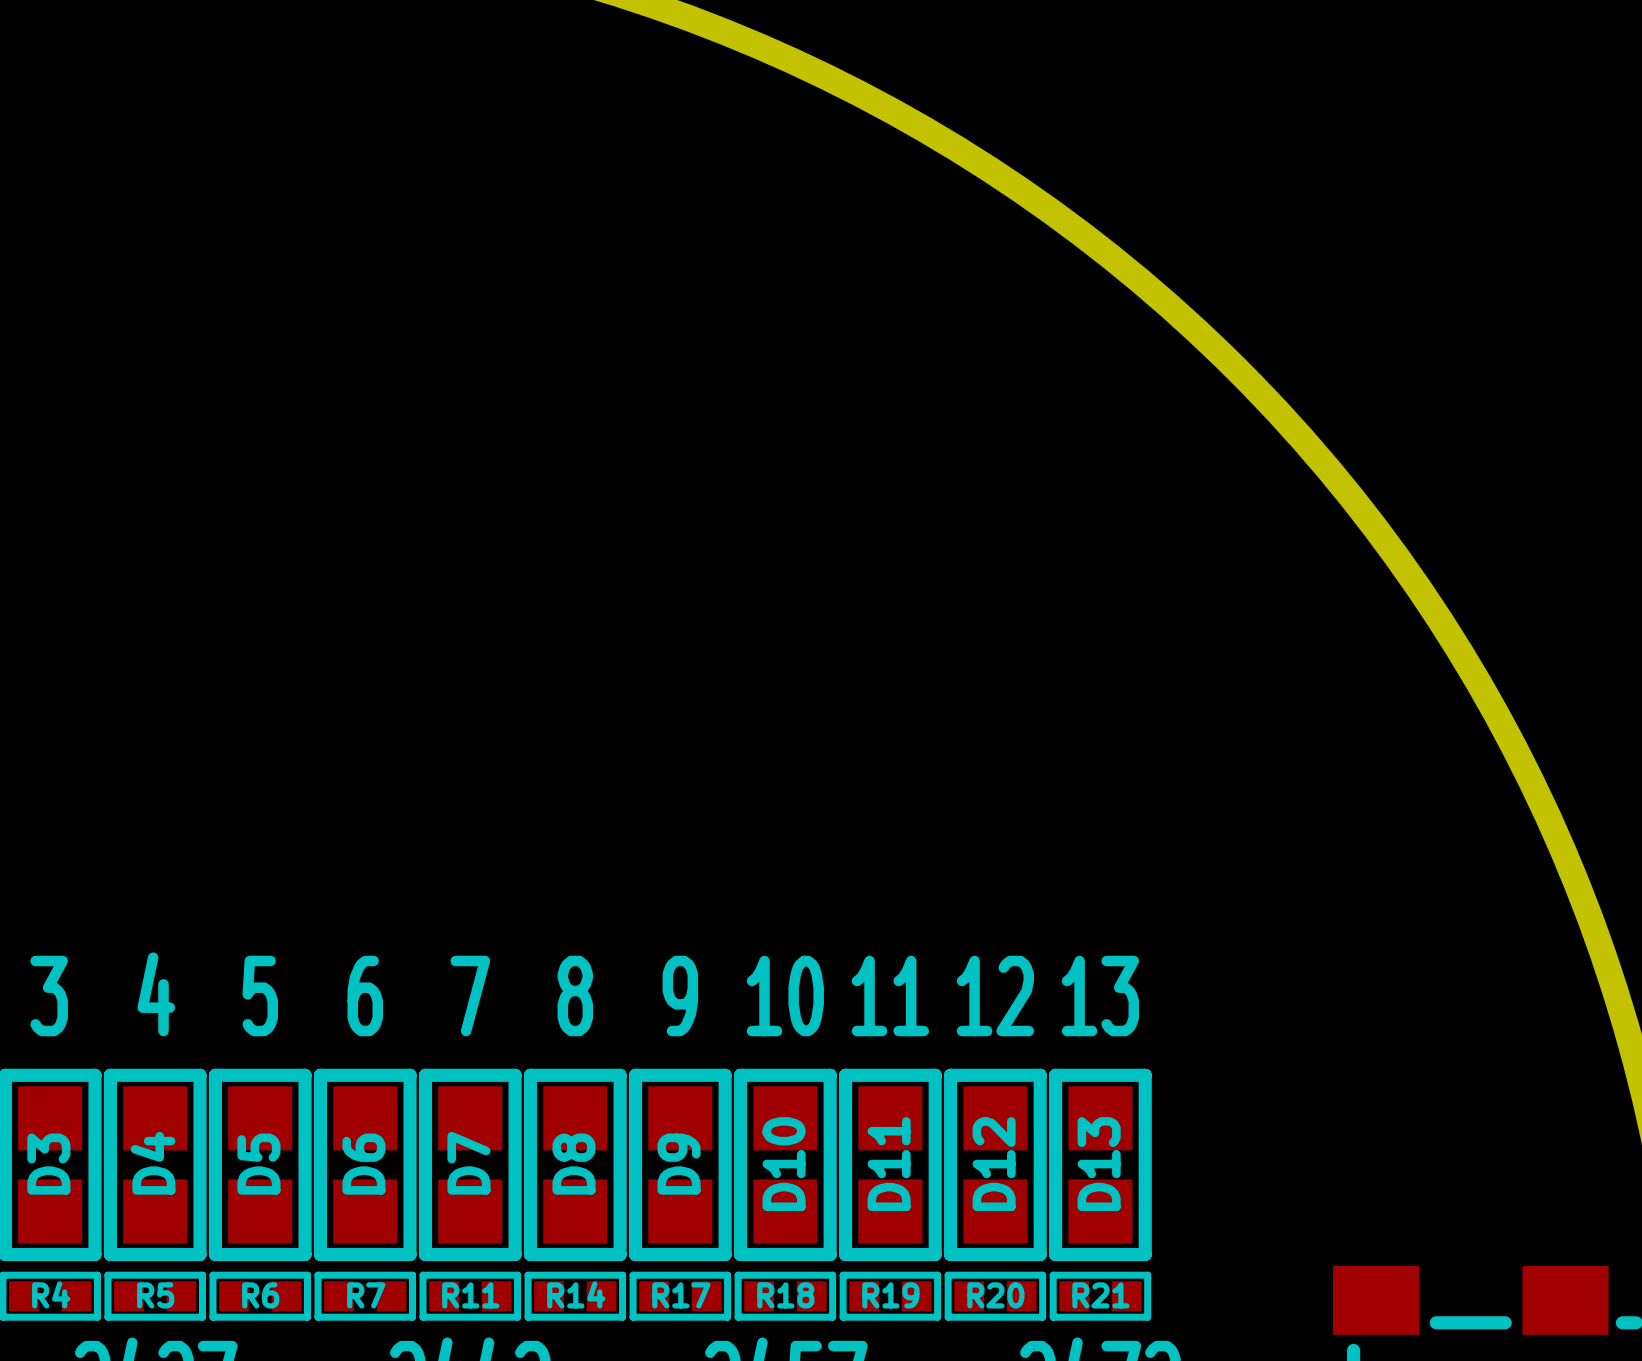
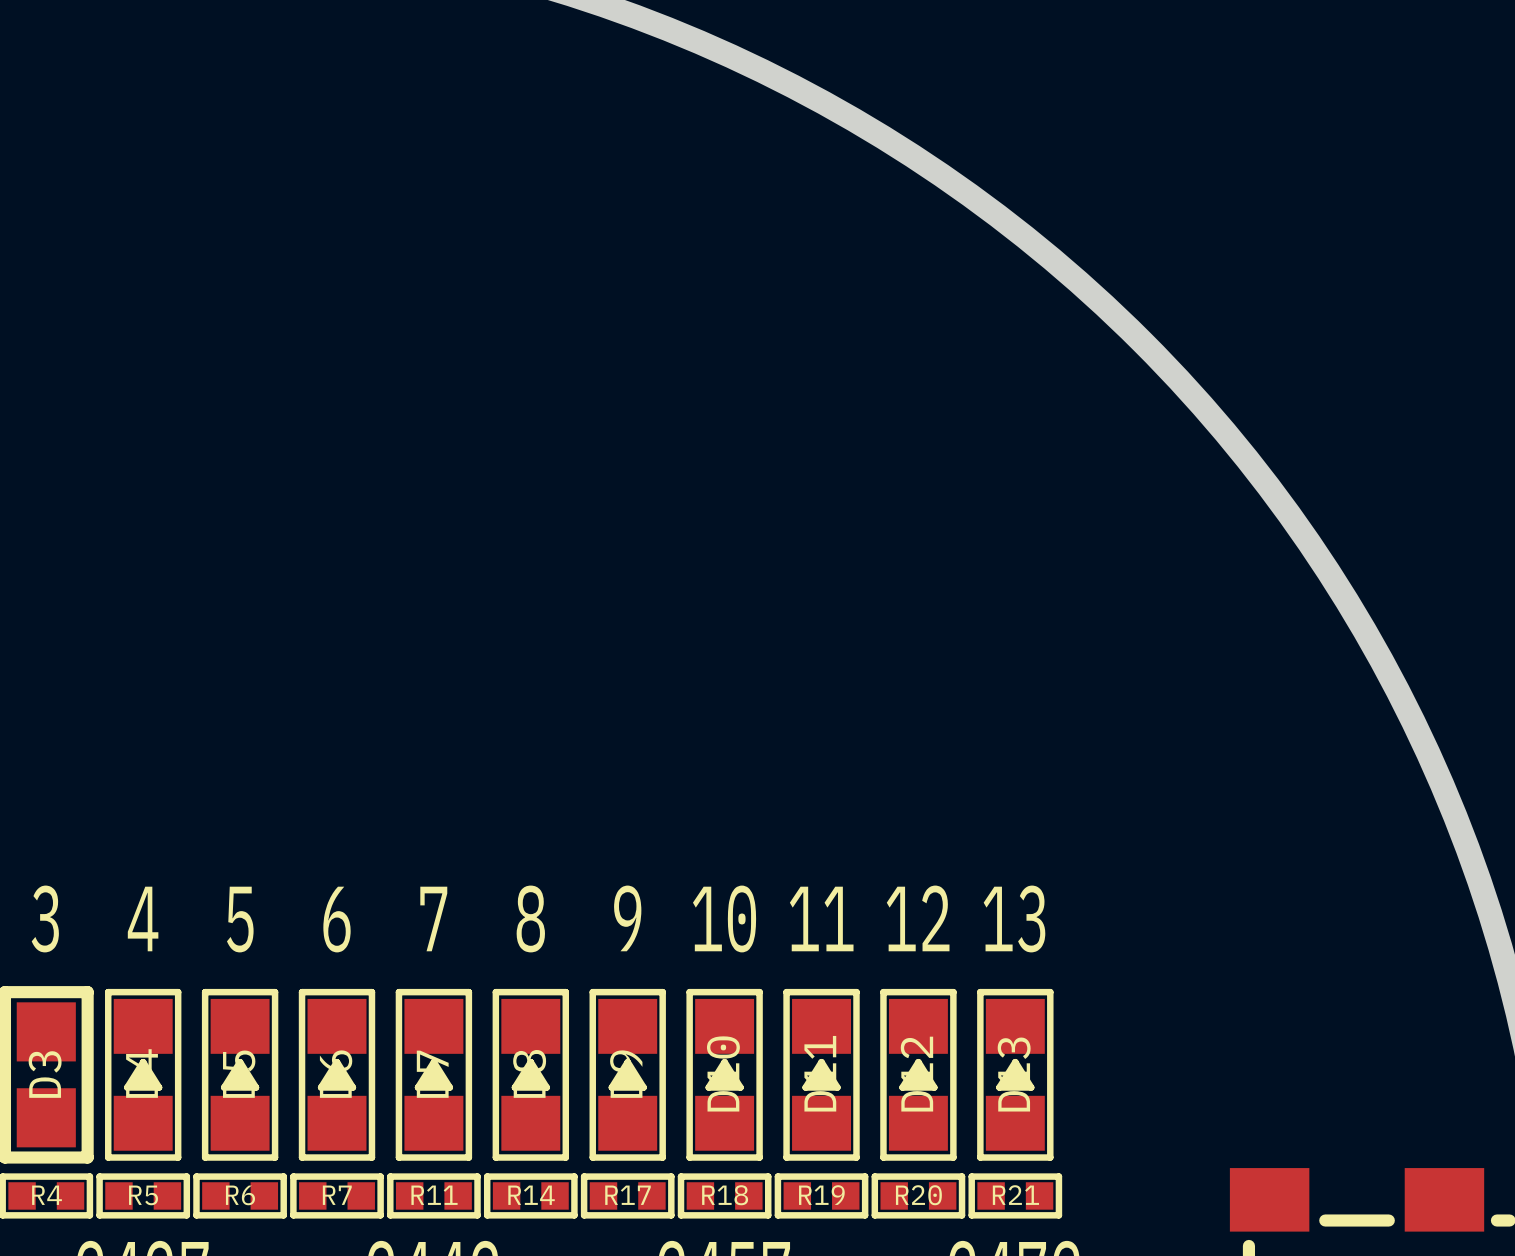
D4 footprint: [103, 1068, 207, 1262] -> [105, 988, 182, 1161]
D5 footprint: [208, 1068, 312, 1262] -> [201, 988, 279, 1161]
D6 footprint: [313, 1068, 417, 1262] -> [298, 988, 376, 1161]
D7 footprint: [418, 1068, 522, 1262] -> [395, 988, 473, 1161]
D8 footprint: [523, 1068, 627, 1262] -> [492, 988, 570, 1161]
D9 footprint: [628, 1068, 732, 1262] -> [589, 988, 666, 1161]
D10 footprint: [733, 1068, 837, 1262] -> [686, 988, 763, 1161]
D11 footprint: [838, 1068, 942, 1262] -> [783, 988, 860, 1161]
D12 footprint: [944, 1068, 1047, 1262] -> [880, 988, 957, 1161]
D13 footprint: [1049, 1068, 1152, 1262] -> [977, 988, 1054, 1161]

